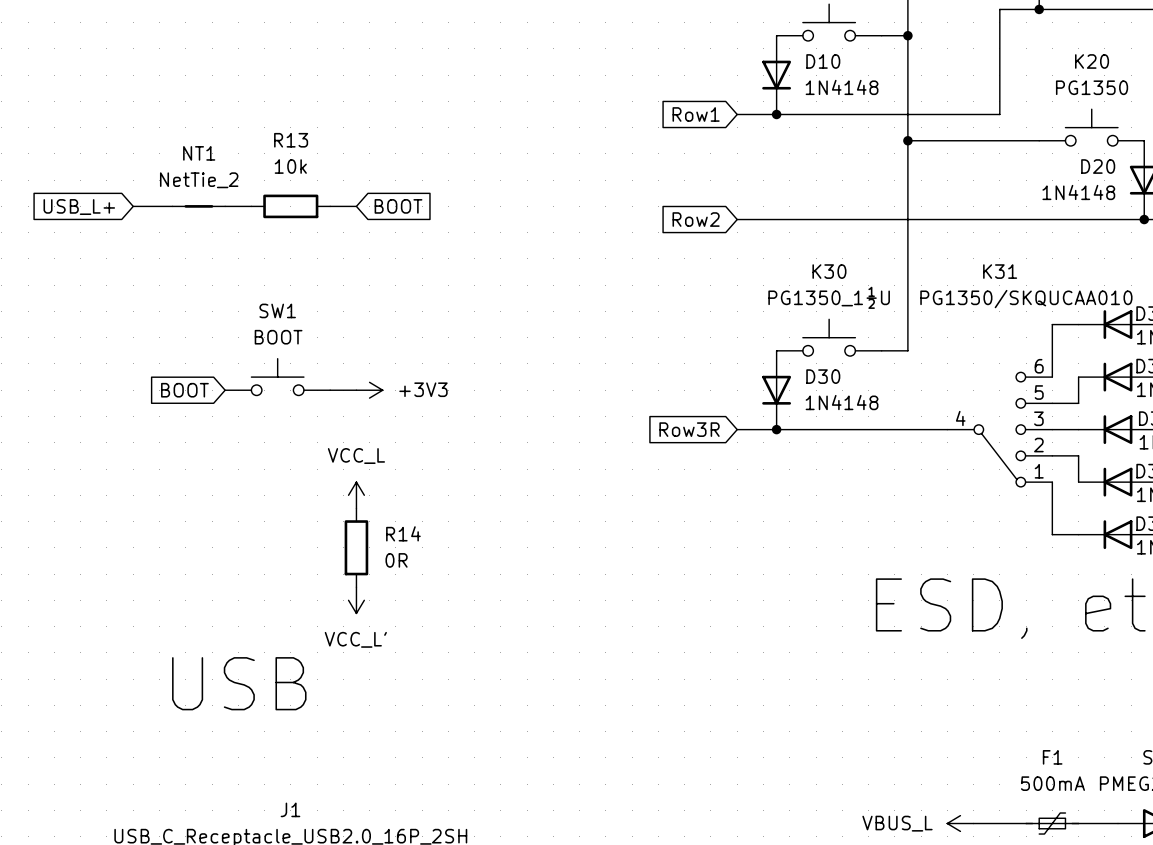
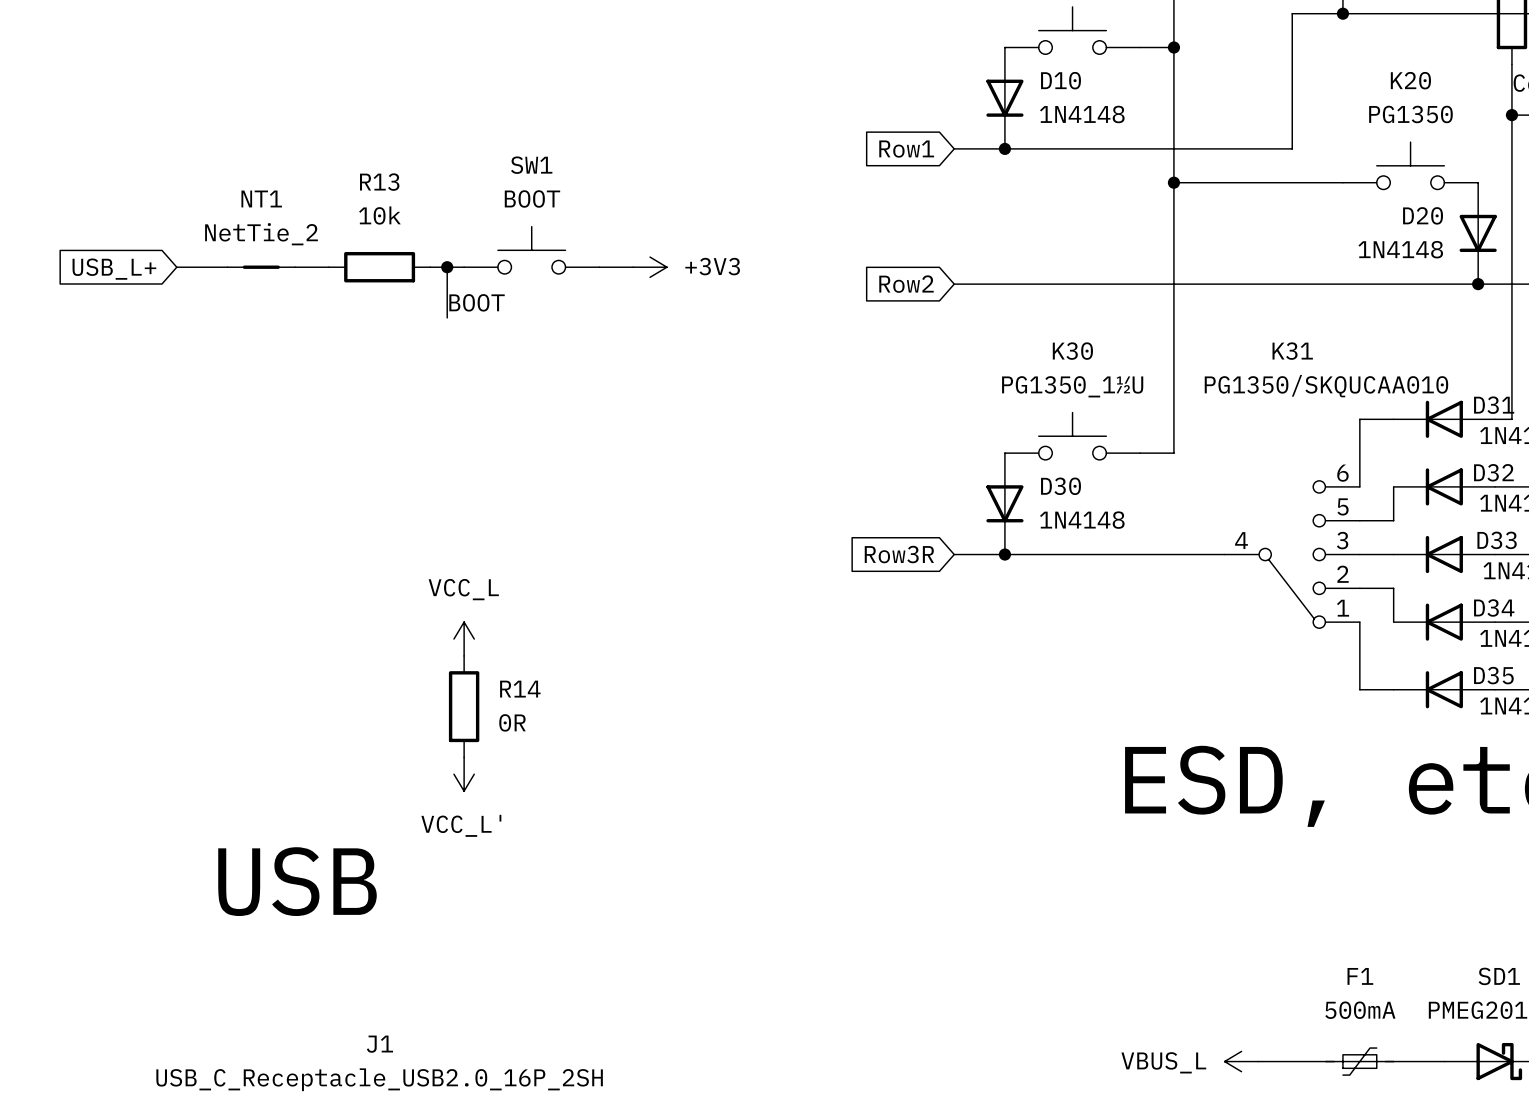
wire: none -> (447, 267) (447, 317)
junction: none -> (447, 267)
global label: BOOT (398, 206) -> none
label: none -> BOOT (477, 302)
SW1 position: (277, 377) -> (531, 250)
global label: BOOT (184, 390) -> none
wire: (330, 390) (356, 390) -> (599, 267) (633, 267)
power symbol position: +3V3 (369, 390) -> +3V3 (650, 267)

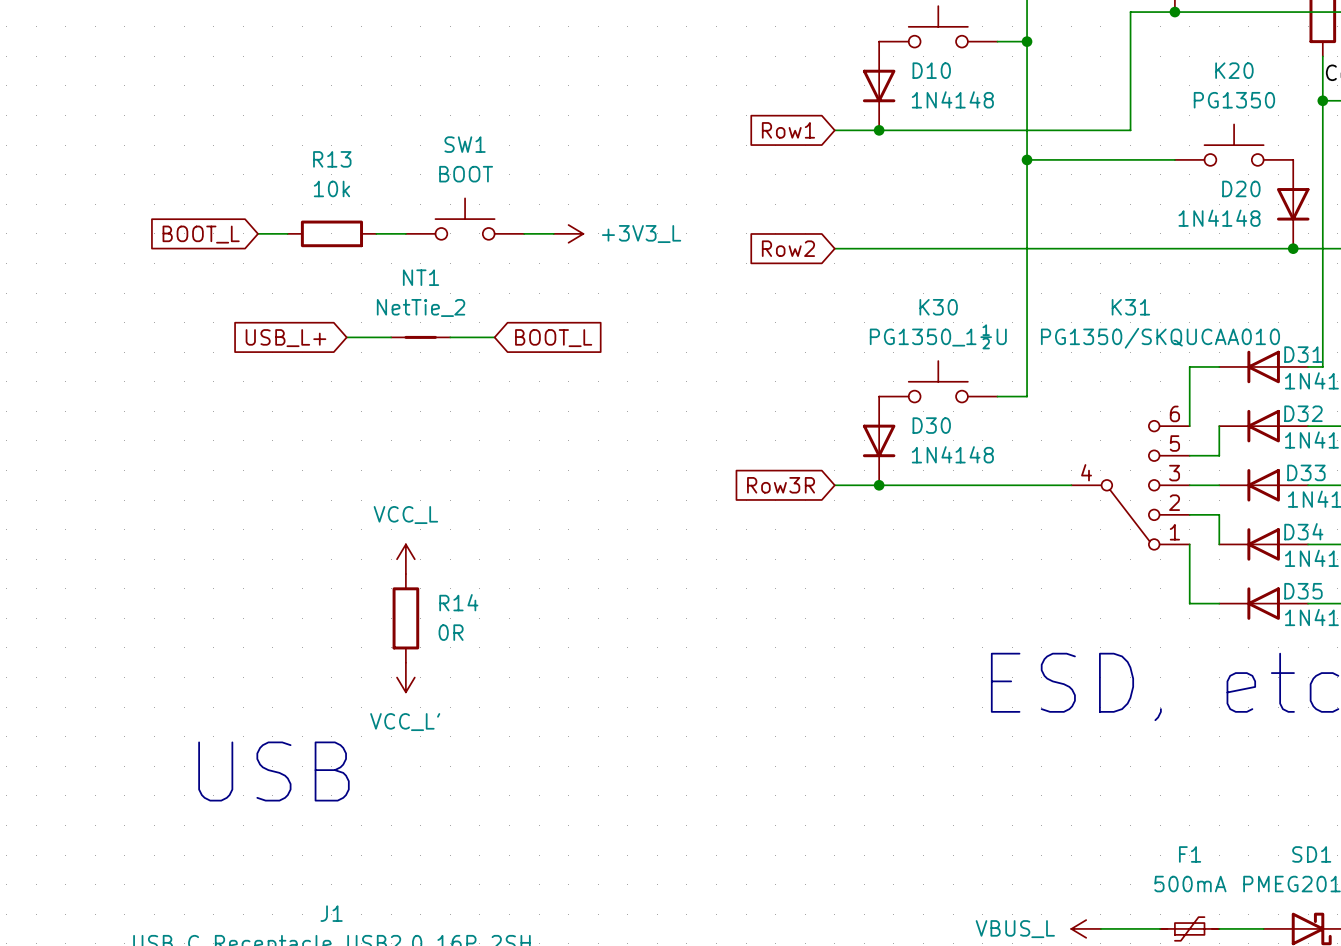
wire: (176, 267) (227, 267) -> (346, 337) (391, 337)
NT1 position: (261, 267) -> (420, 337)
wire: (447, 267) (447, 317) -> none
junction: (447, 267) -> none
power symbol: +3V3 (650, 267) -> +3V3_L (568, 233)
global label position: USB_L+ (114, 269) -> USB_L+ (285, 338)
global label: none -> BOOT_L (201, 234)
label: BOOT (477, 302) -> none
wire: none -> (450, 337) (494, 337)
global label: none -> BOOT_L (553, 338)

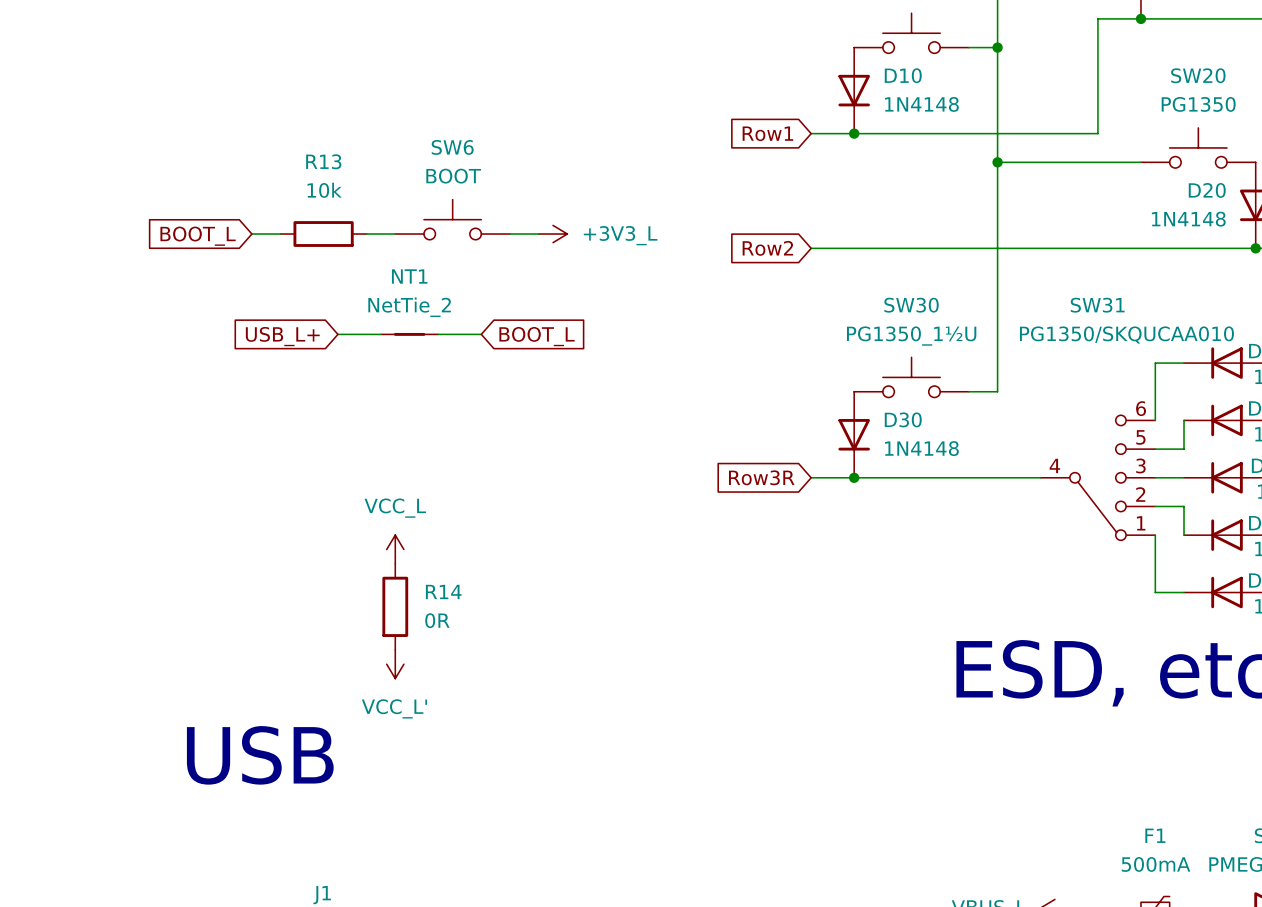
K20 name: K20 (1234, 70) -> SW20 (1198, 75)
SW1 name: SW1 (465, 144) -> SW6 (452, 147)
K30 name: K30 (938, 307) -> SW30 (911, 305)
K31 name: K31 (1130, 307) -> SW31 (1097, 305)

